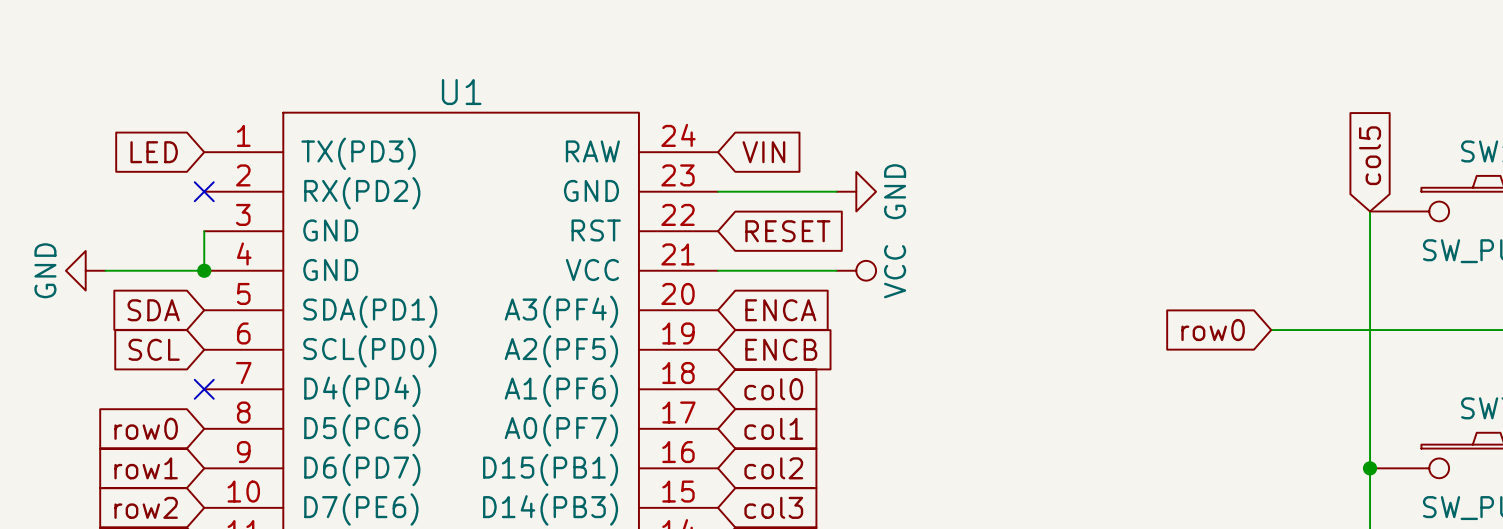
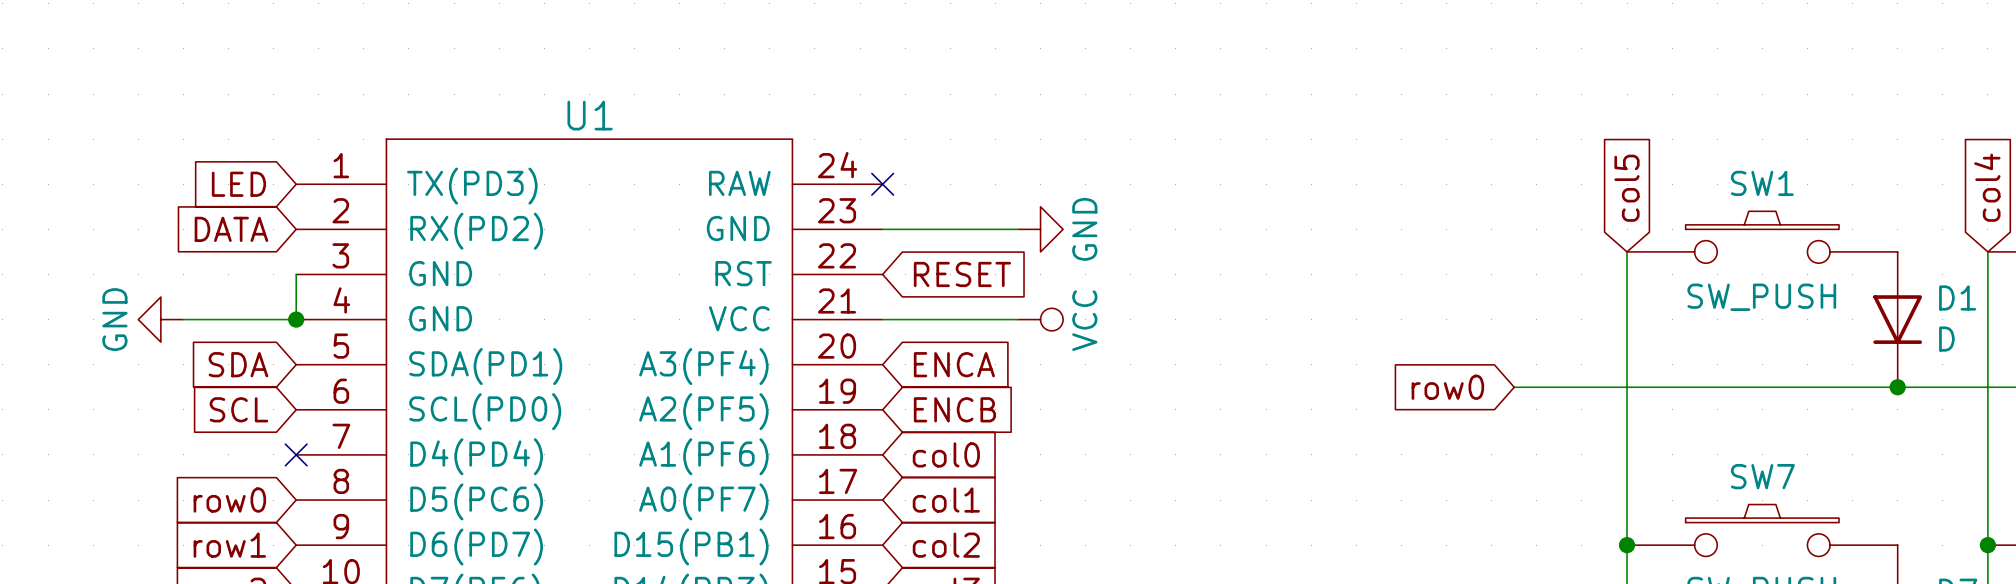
no-connect mark: none -> (882, 184)
global label: VIN (763, 152) -> none
global label: none -> DATA (231, 229)
no-connect mark: (204, 191) -> none

